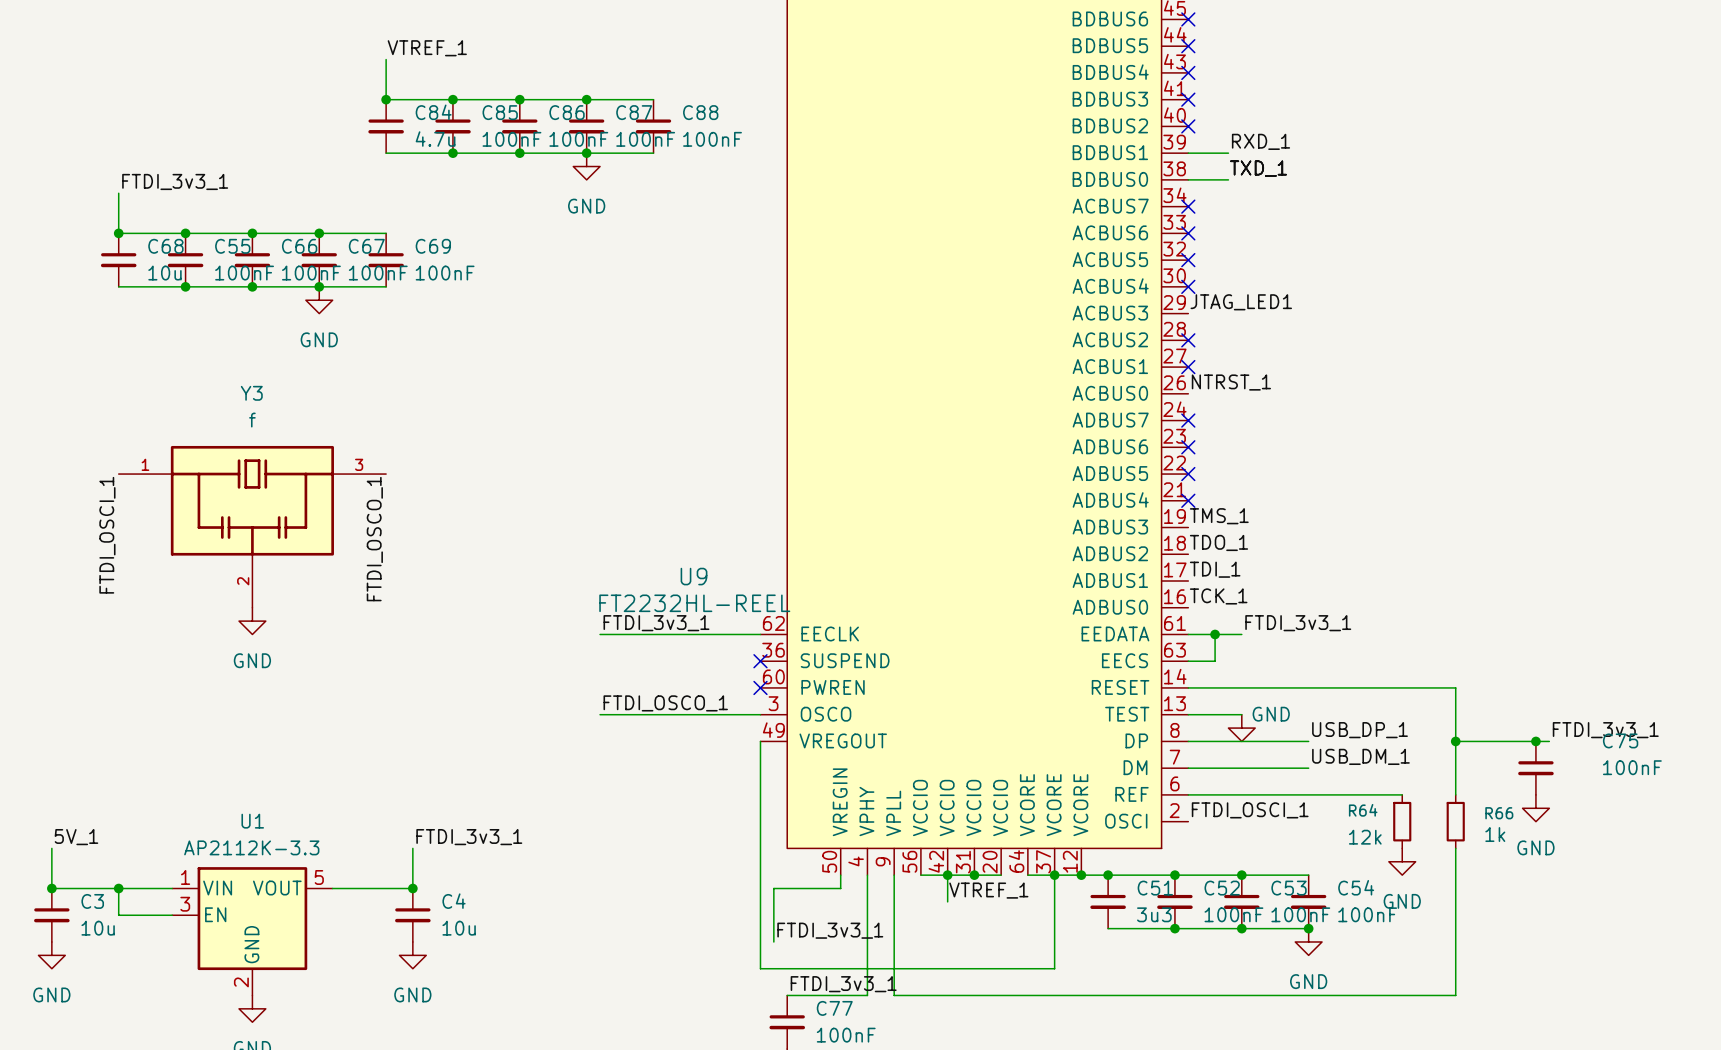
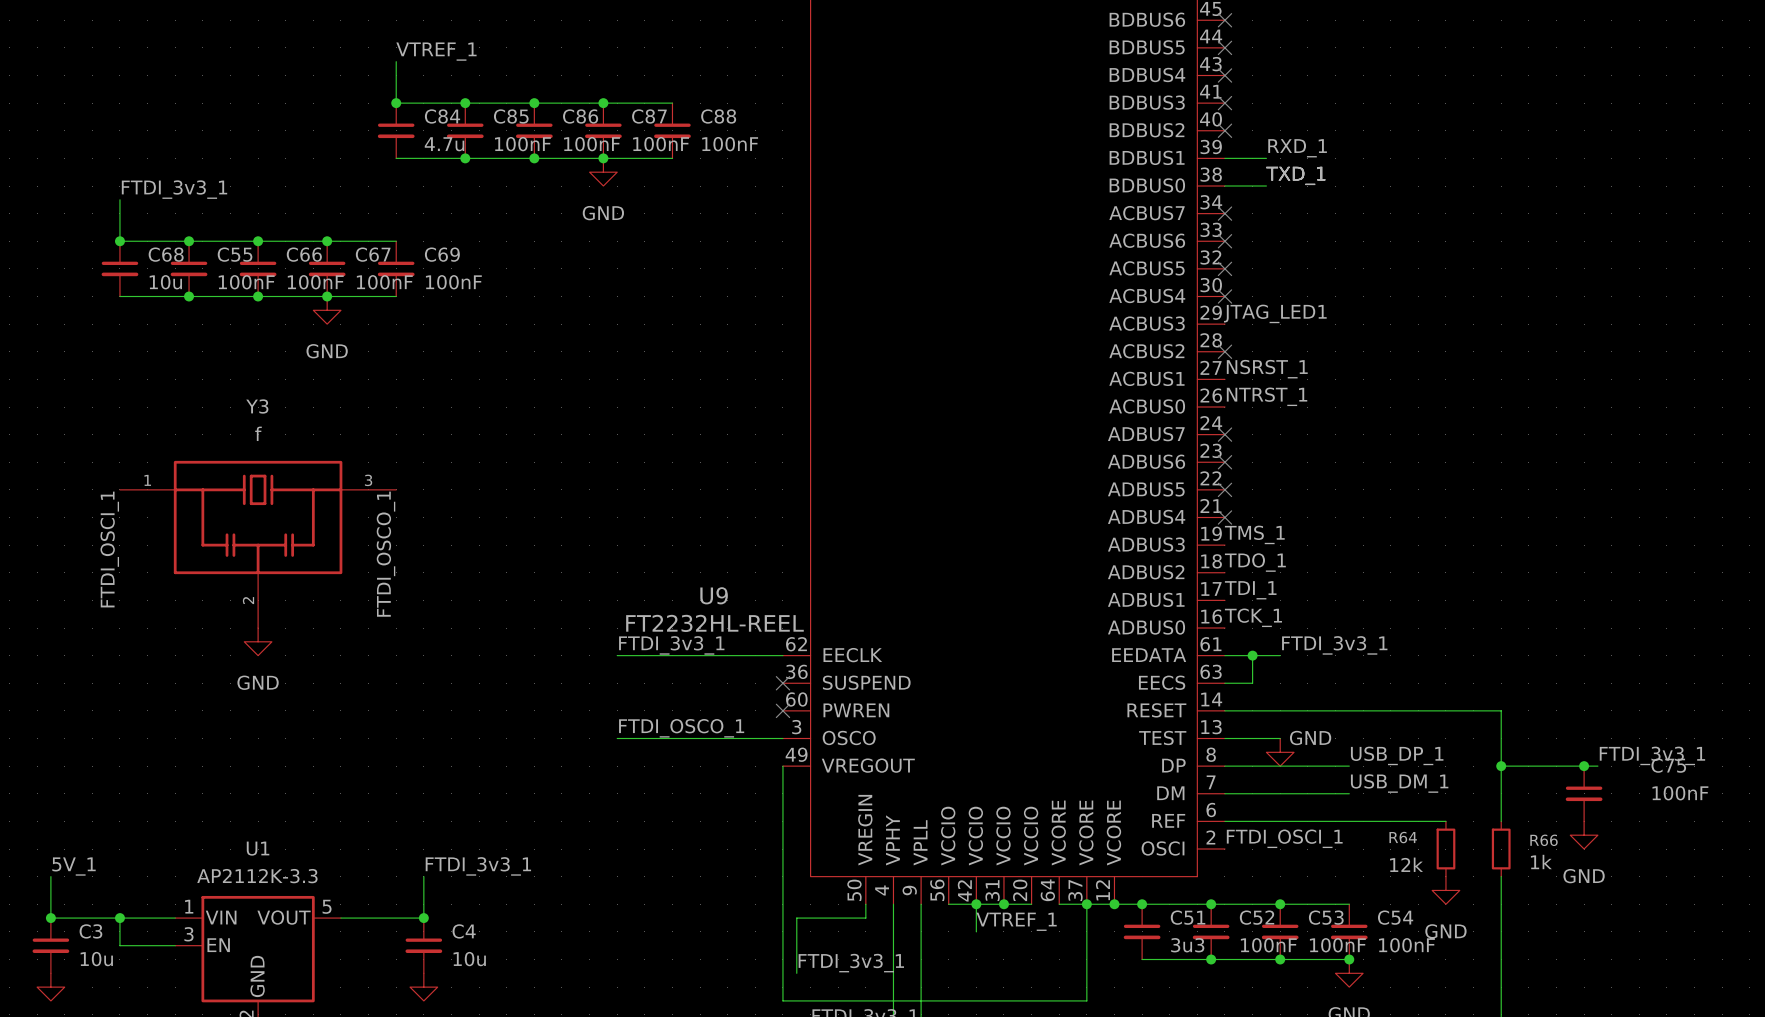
label: none -> NSRST_1 (1267, 369)
no-connect mark: (1188, 367) -> none

